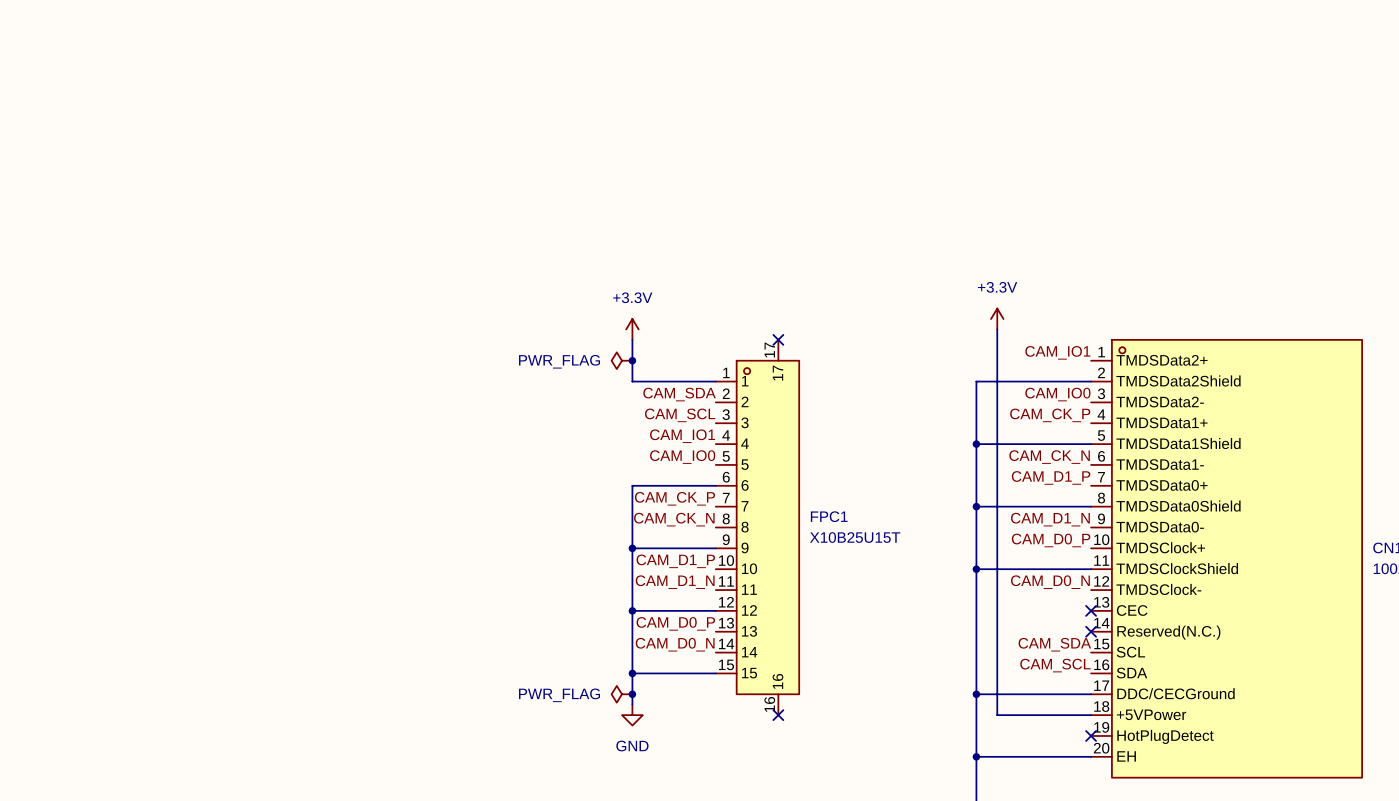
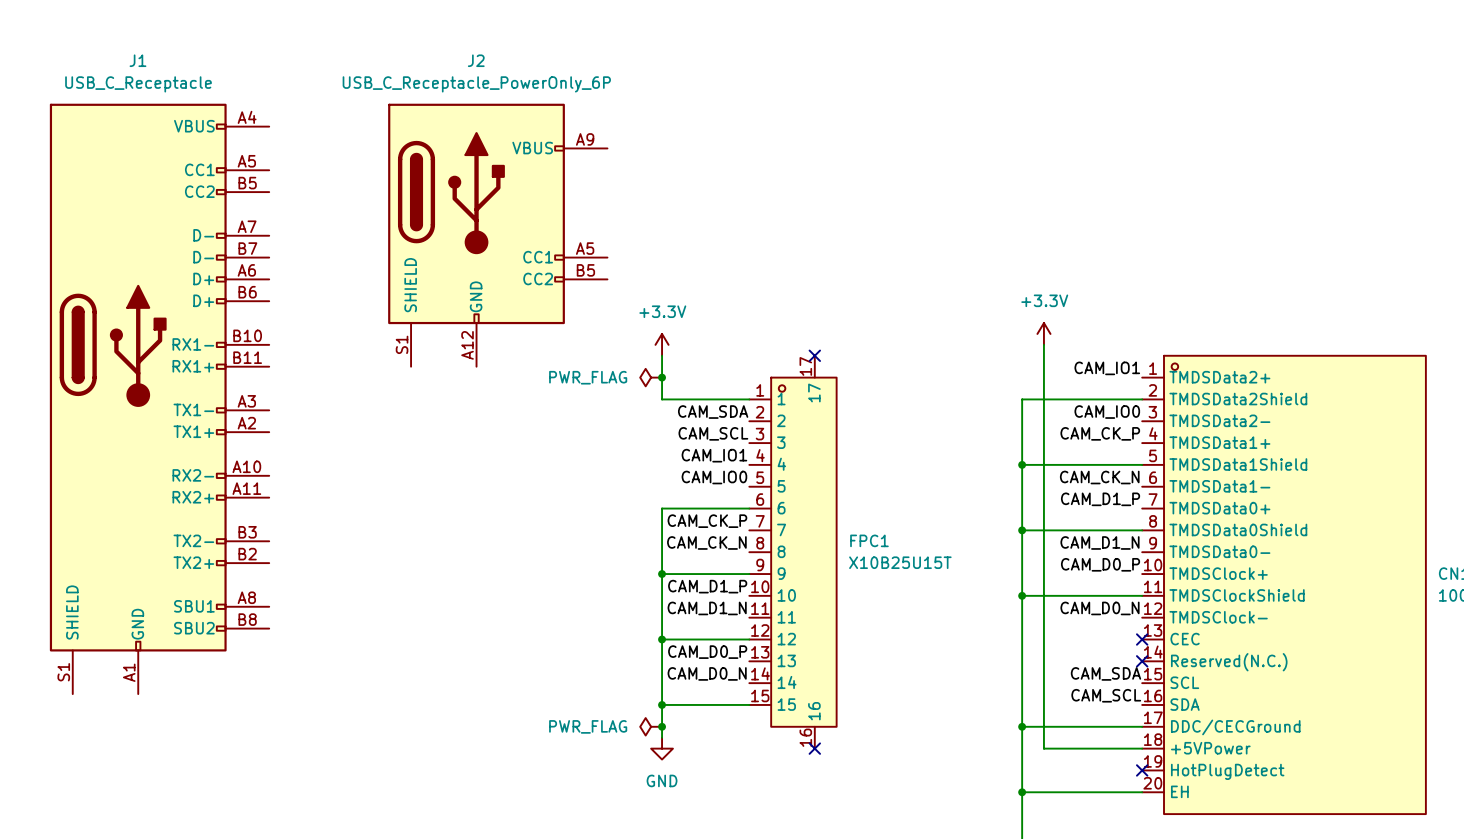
J2: none -> USB_C_Receptacle_PowerOnly_6P (497, 235)
J1: none -> USB_C_Receptacle (159, 398)

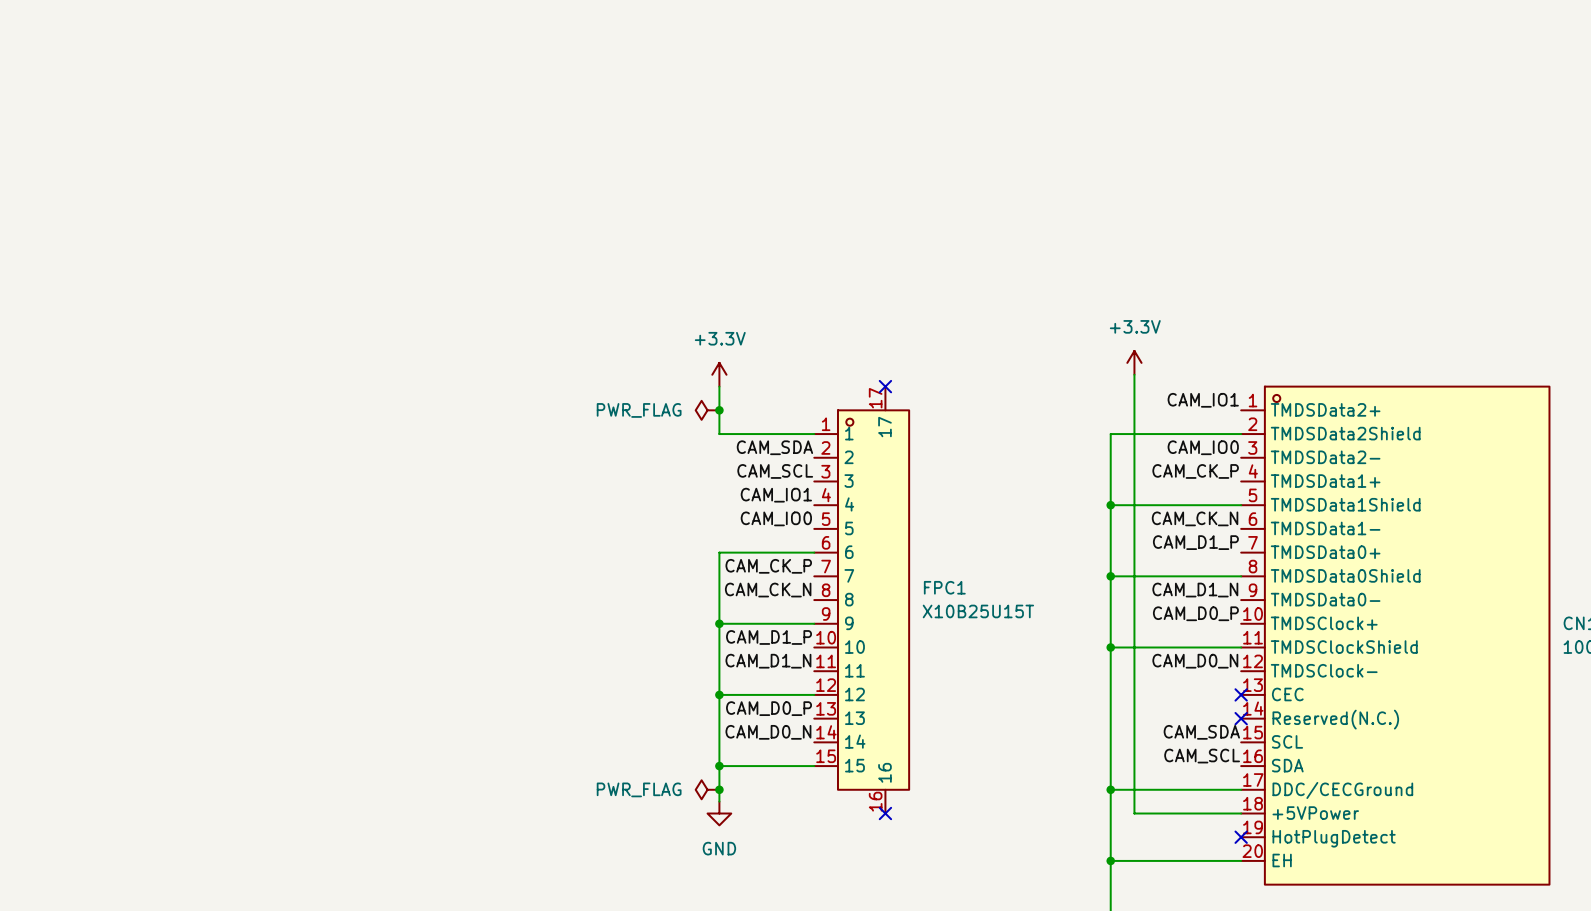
J2: USB_C_Receptacle_PowerOnly_6P (497, 235) -> none
J1: USB_C_Receptacle (159, 398) -> none

